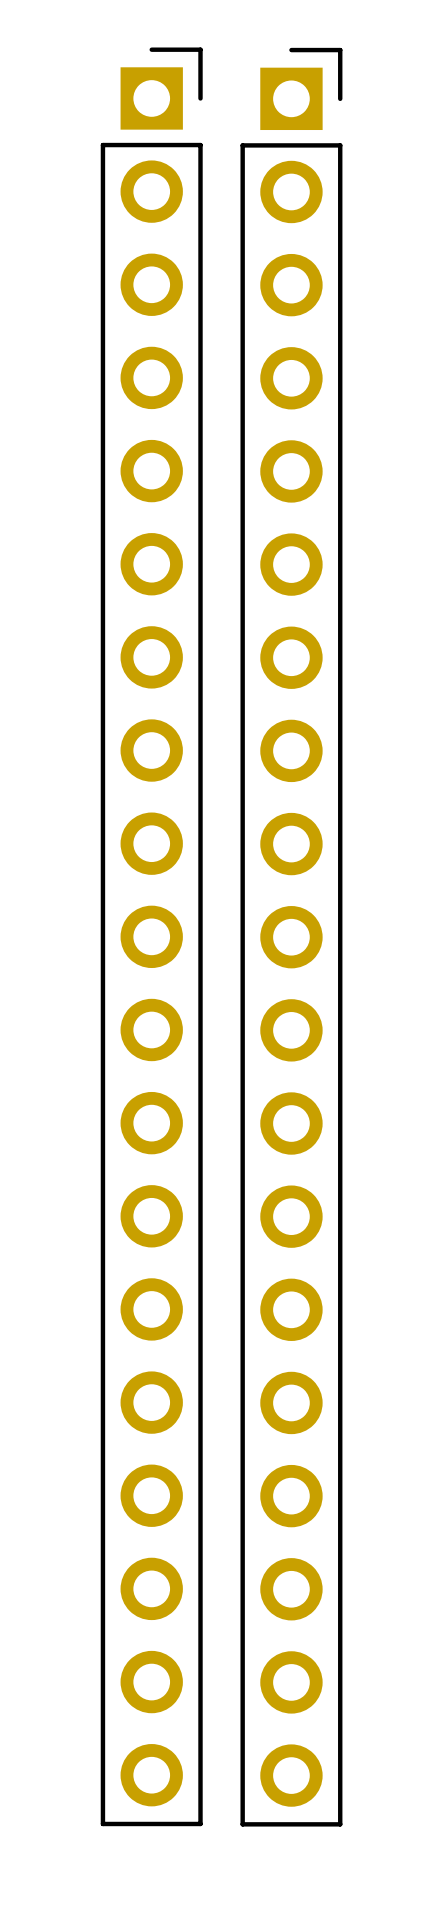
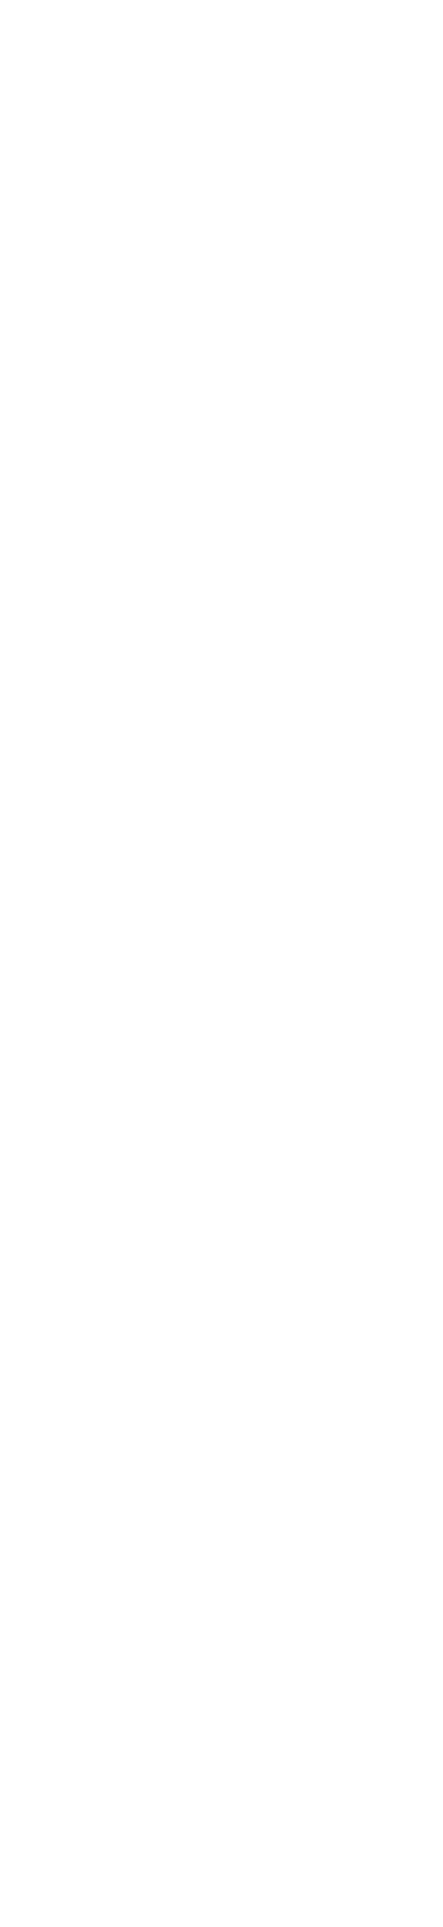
part: (151, 936) -> none
part: (291, 937) -> none

